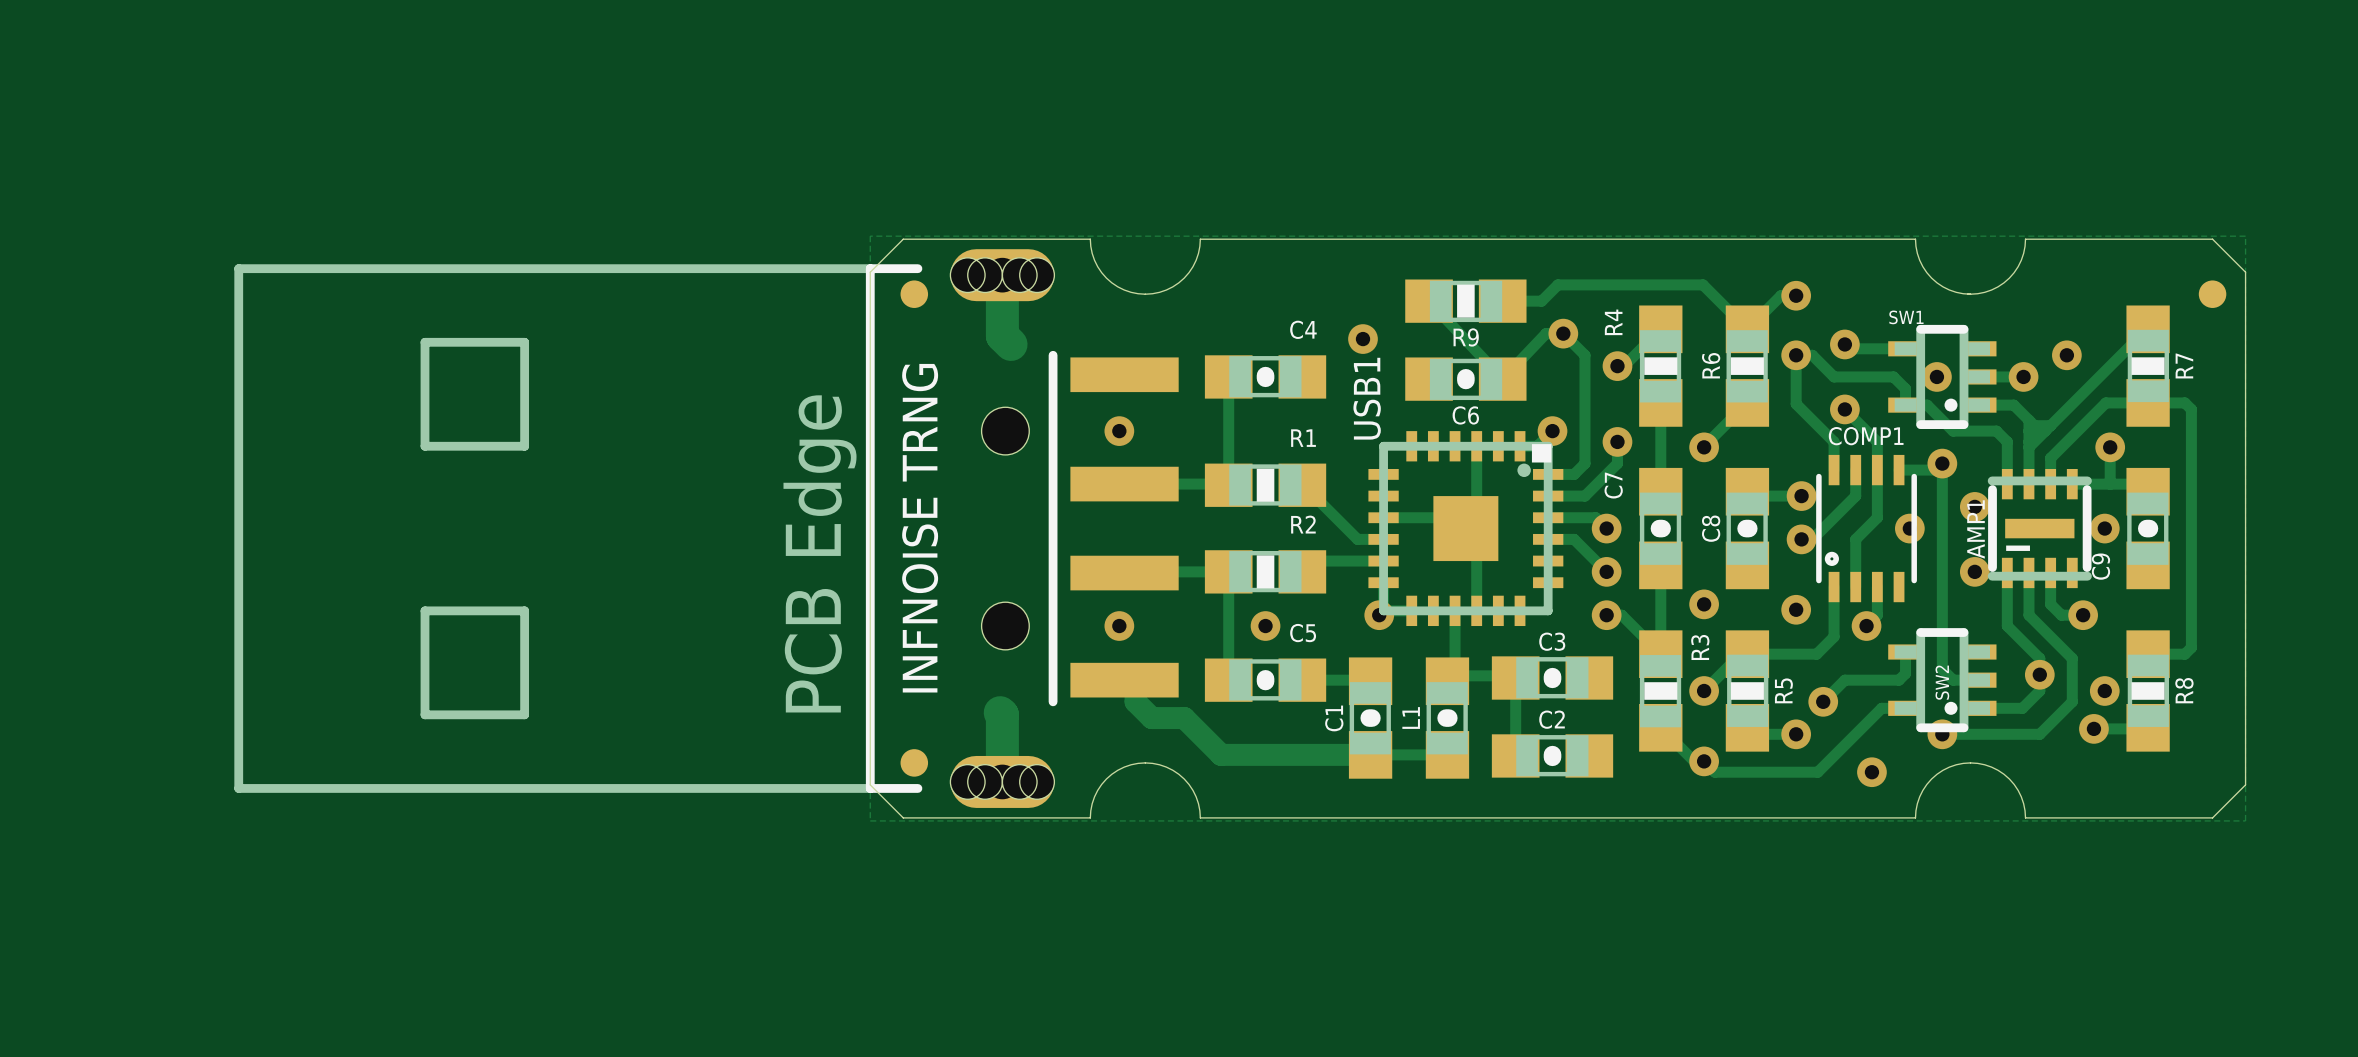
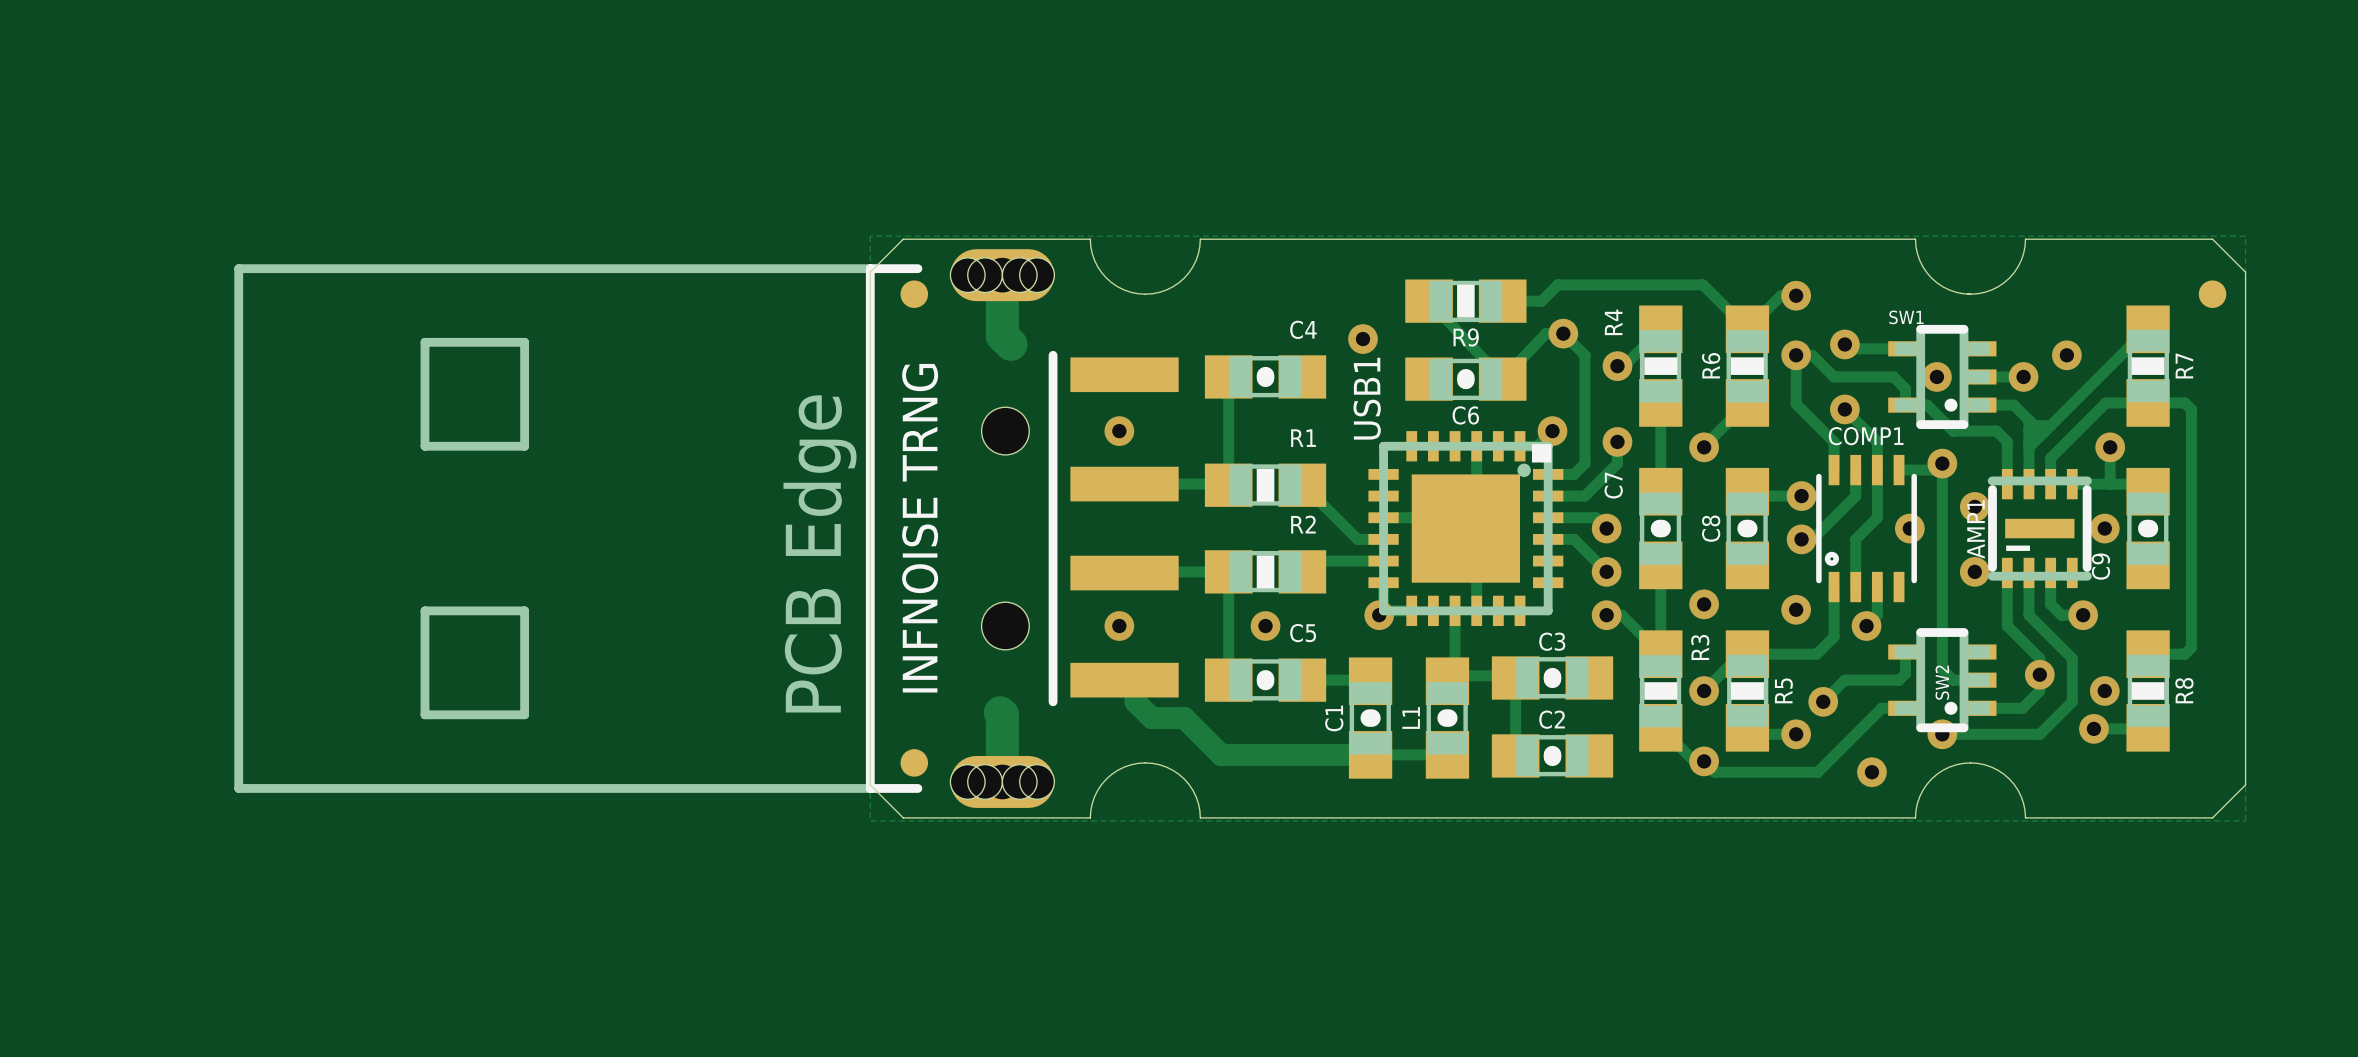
USB1 footprint: [1368, 431, 1564, 627] -> [1368, 431, 1564, 627]

